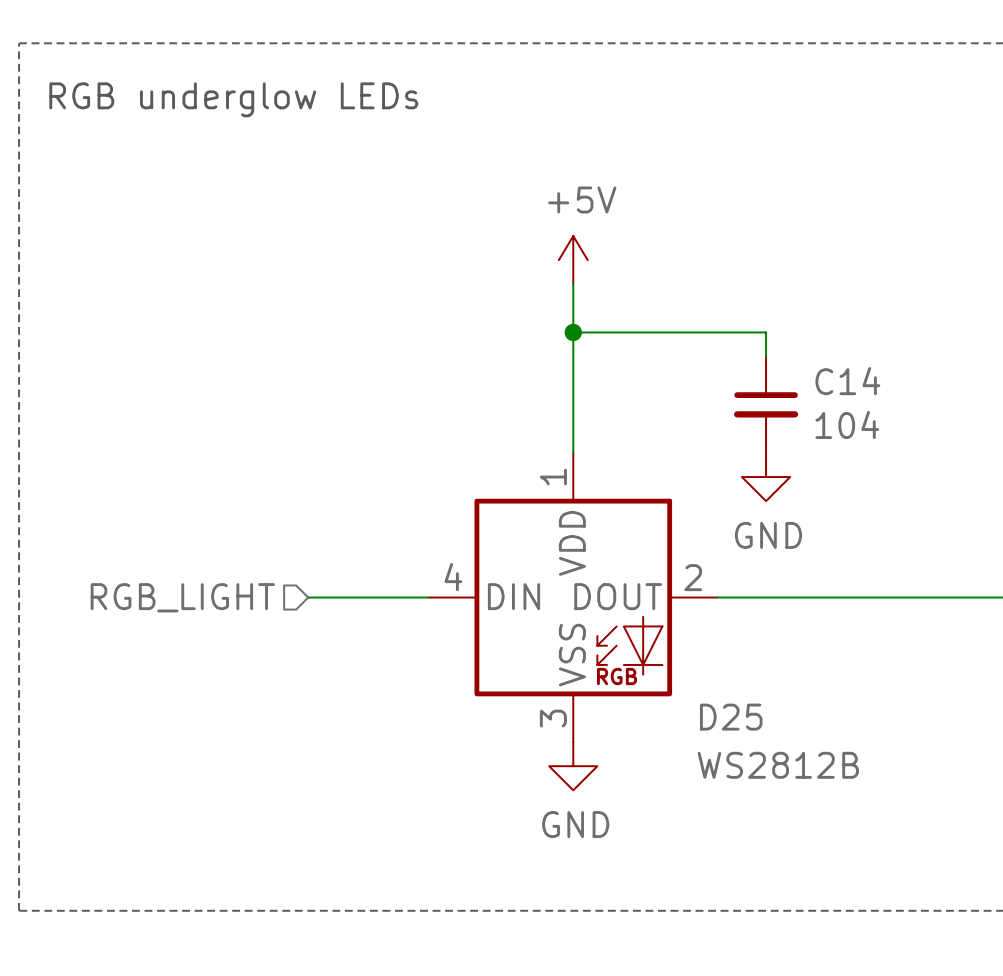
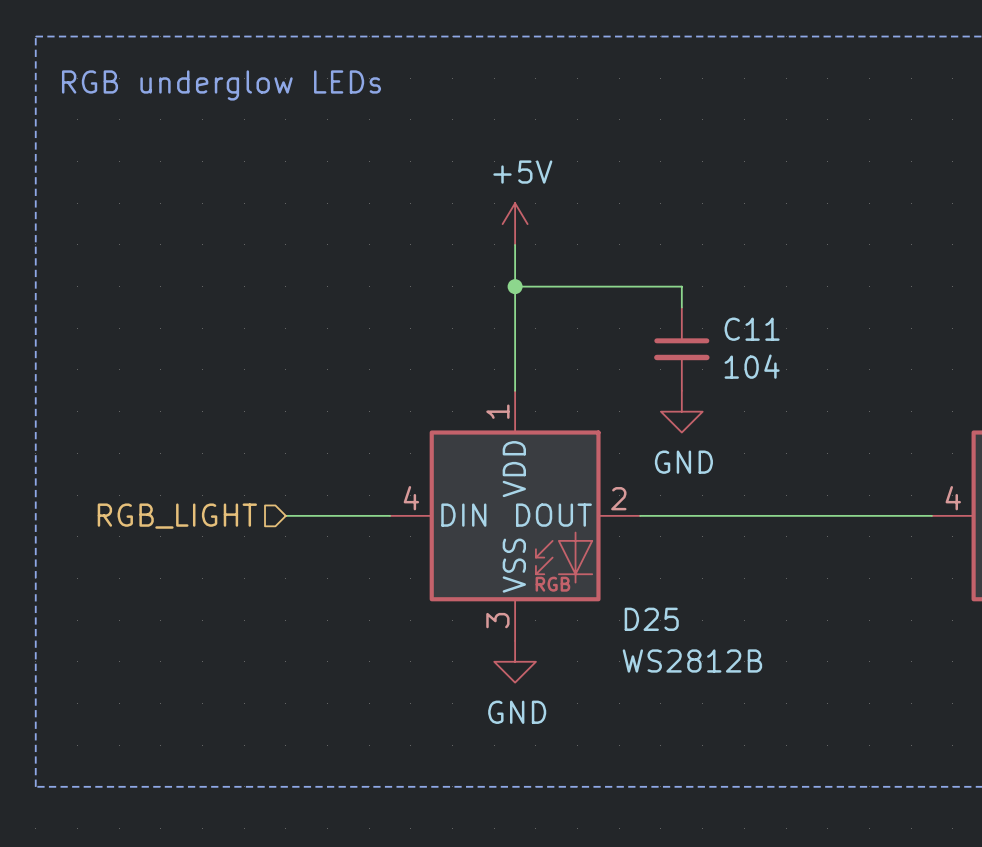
C14 name: C14 (847, 381) -> C11 (752, 329)

